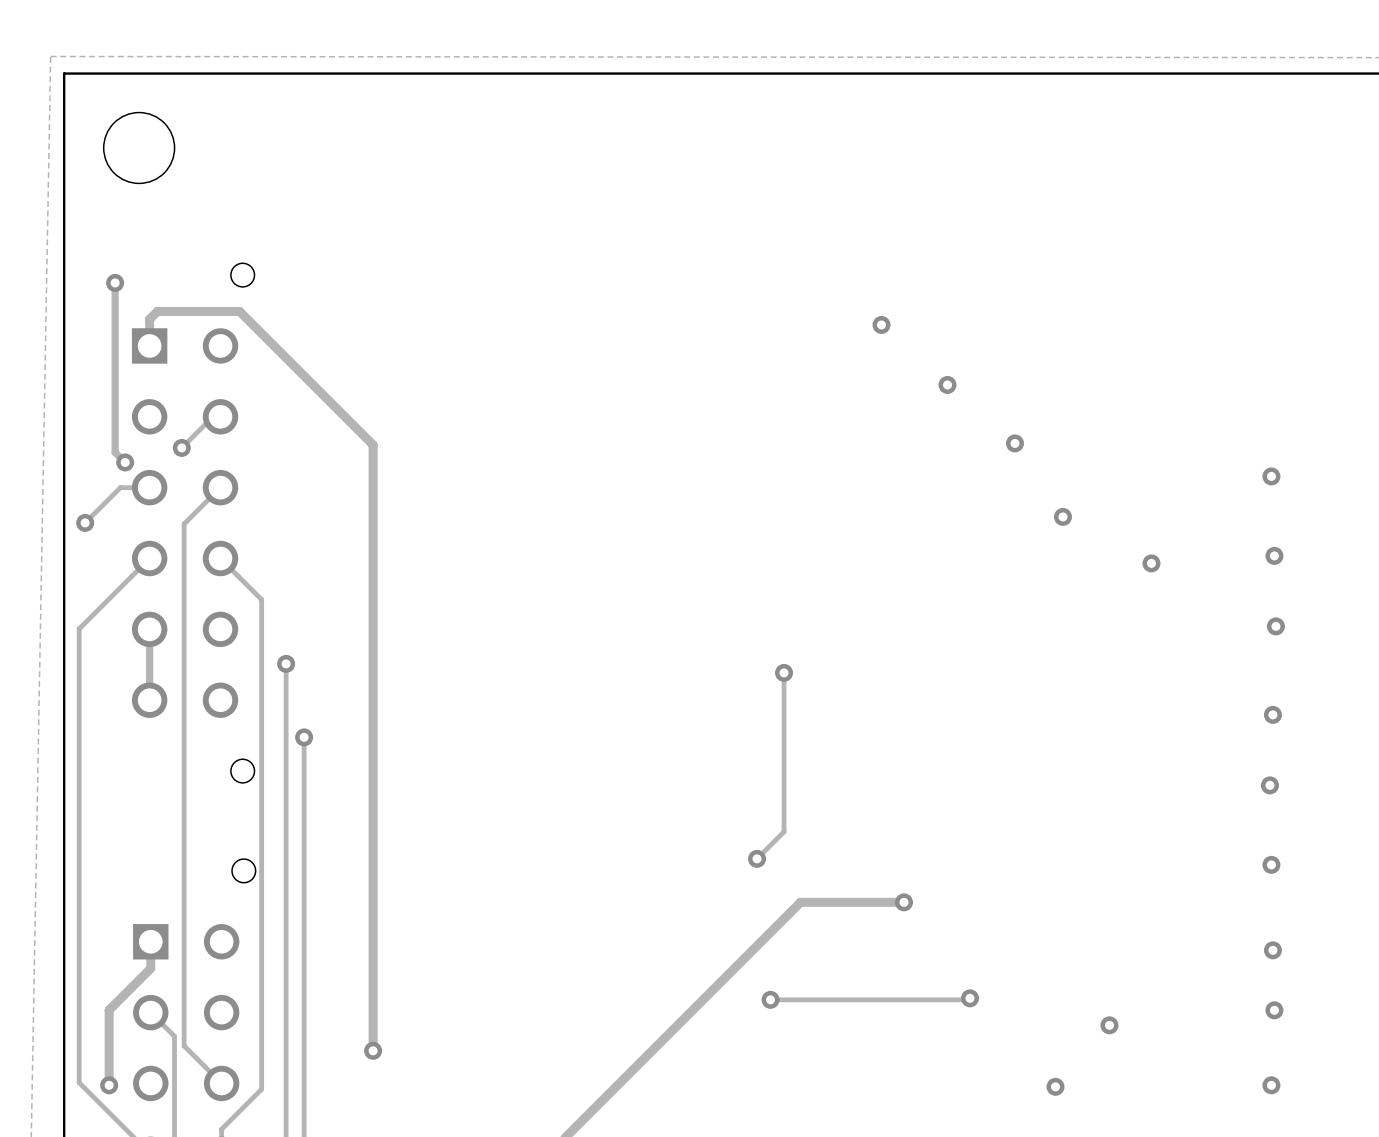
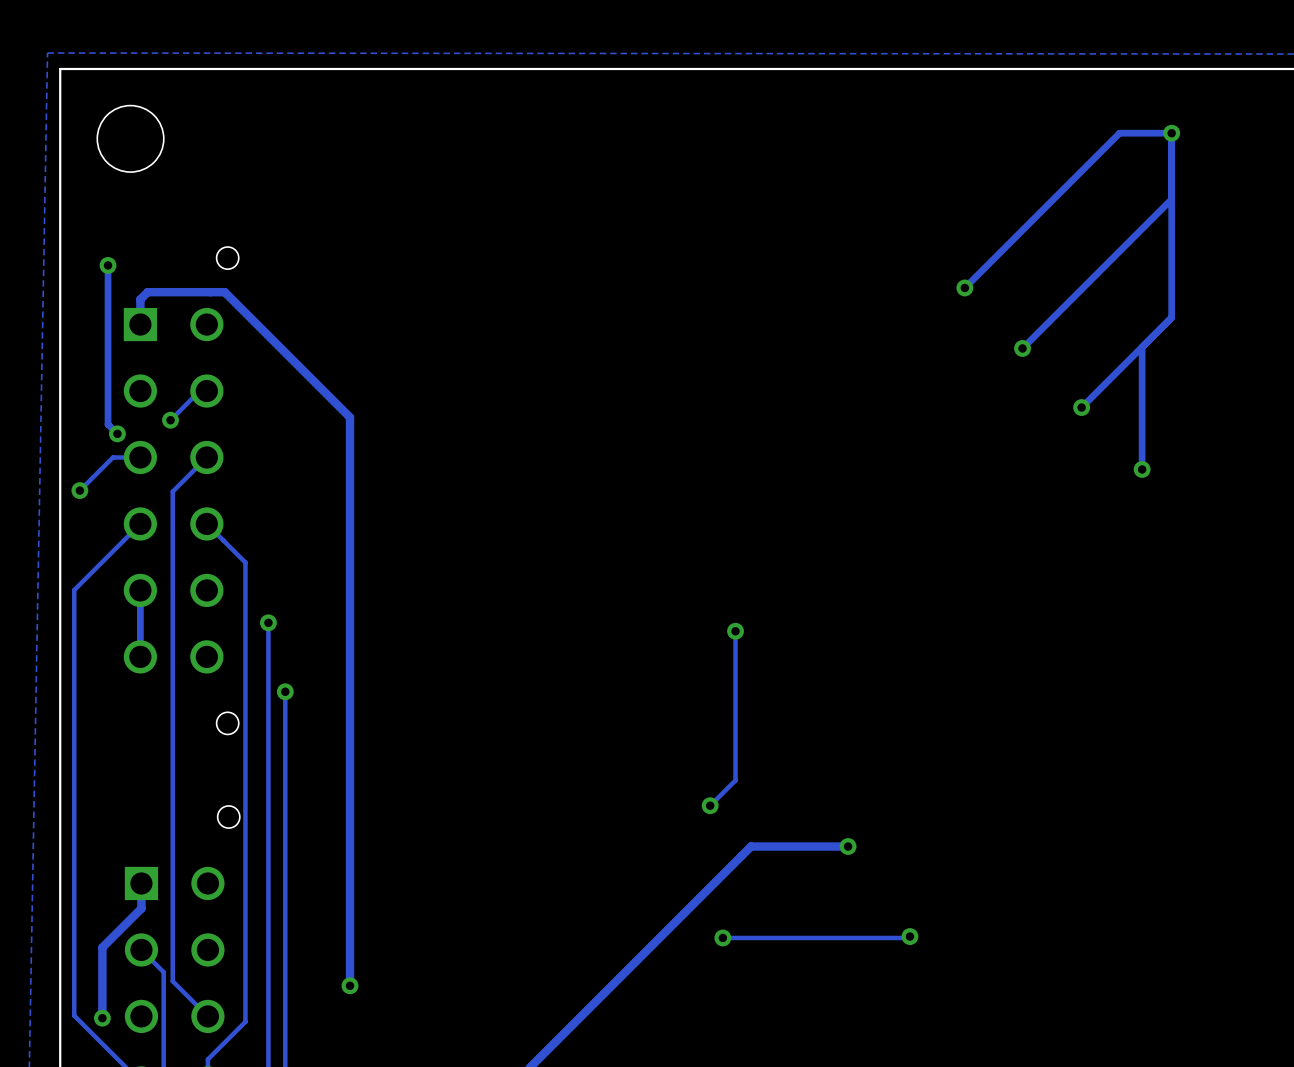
via: none -> (1171, 133)
track: none -> (1171, 199) (1022, 348)
track: none -> (964, 287) (1119, 133) (1171, 133) (1171, 317) (1081, 407)
via: none -> (964, 287)
via: (881, 324) -> none
track: none -> (1142, 347) (1142, 469)
via: none -> (1022, 348)
via: (947, 384) -> none
via: none -> (1081, 407)
via: (1014, 443) -> none
via: (1271, 476) -> none
via: none -> (1142, 469)
via: (1062, 516) -> none
via: (1274, 555) -> none
via: (1151, 563) -> none
via: (1275, 626) -> none
via: (1272, 714) -> none
via: (1269, 785) -> none
via: (1271, 864) -> none
via: (1272, 950) -> none
via: (1274, 1010) -> none
via: (1109, 1025) -> none
via: (1271, 1085) -> none
via: (1055, 1086) -> none

